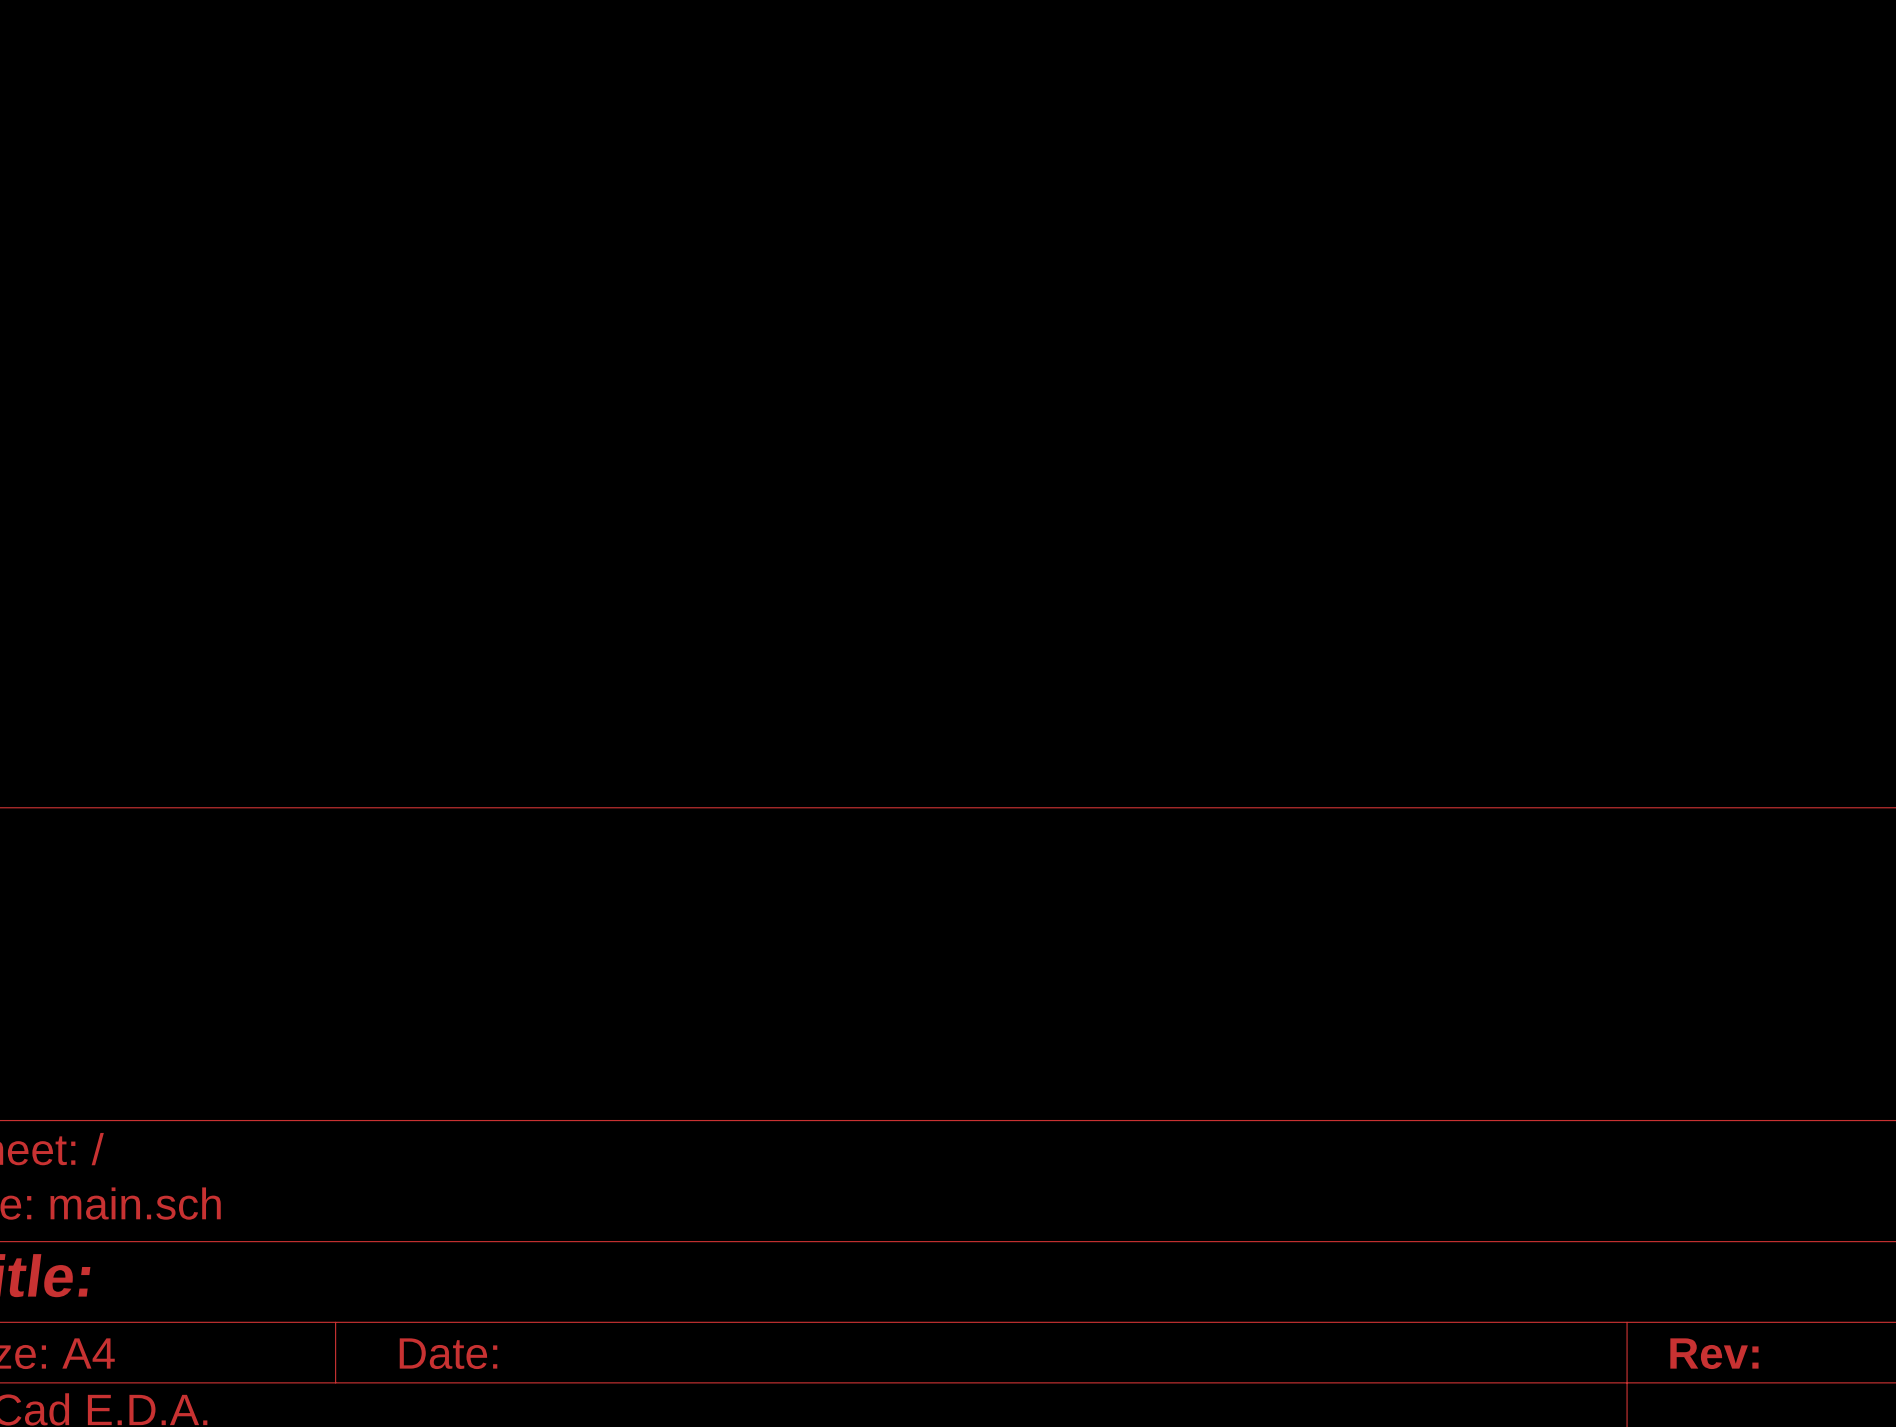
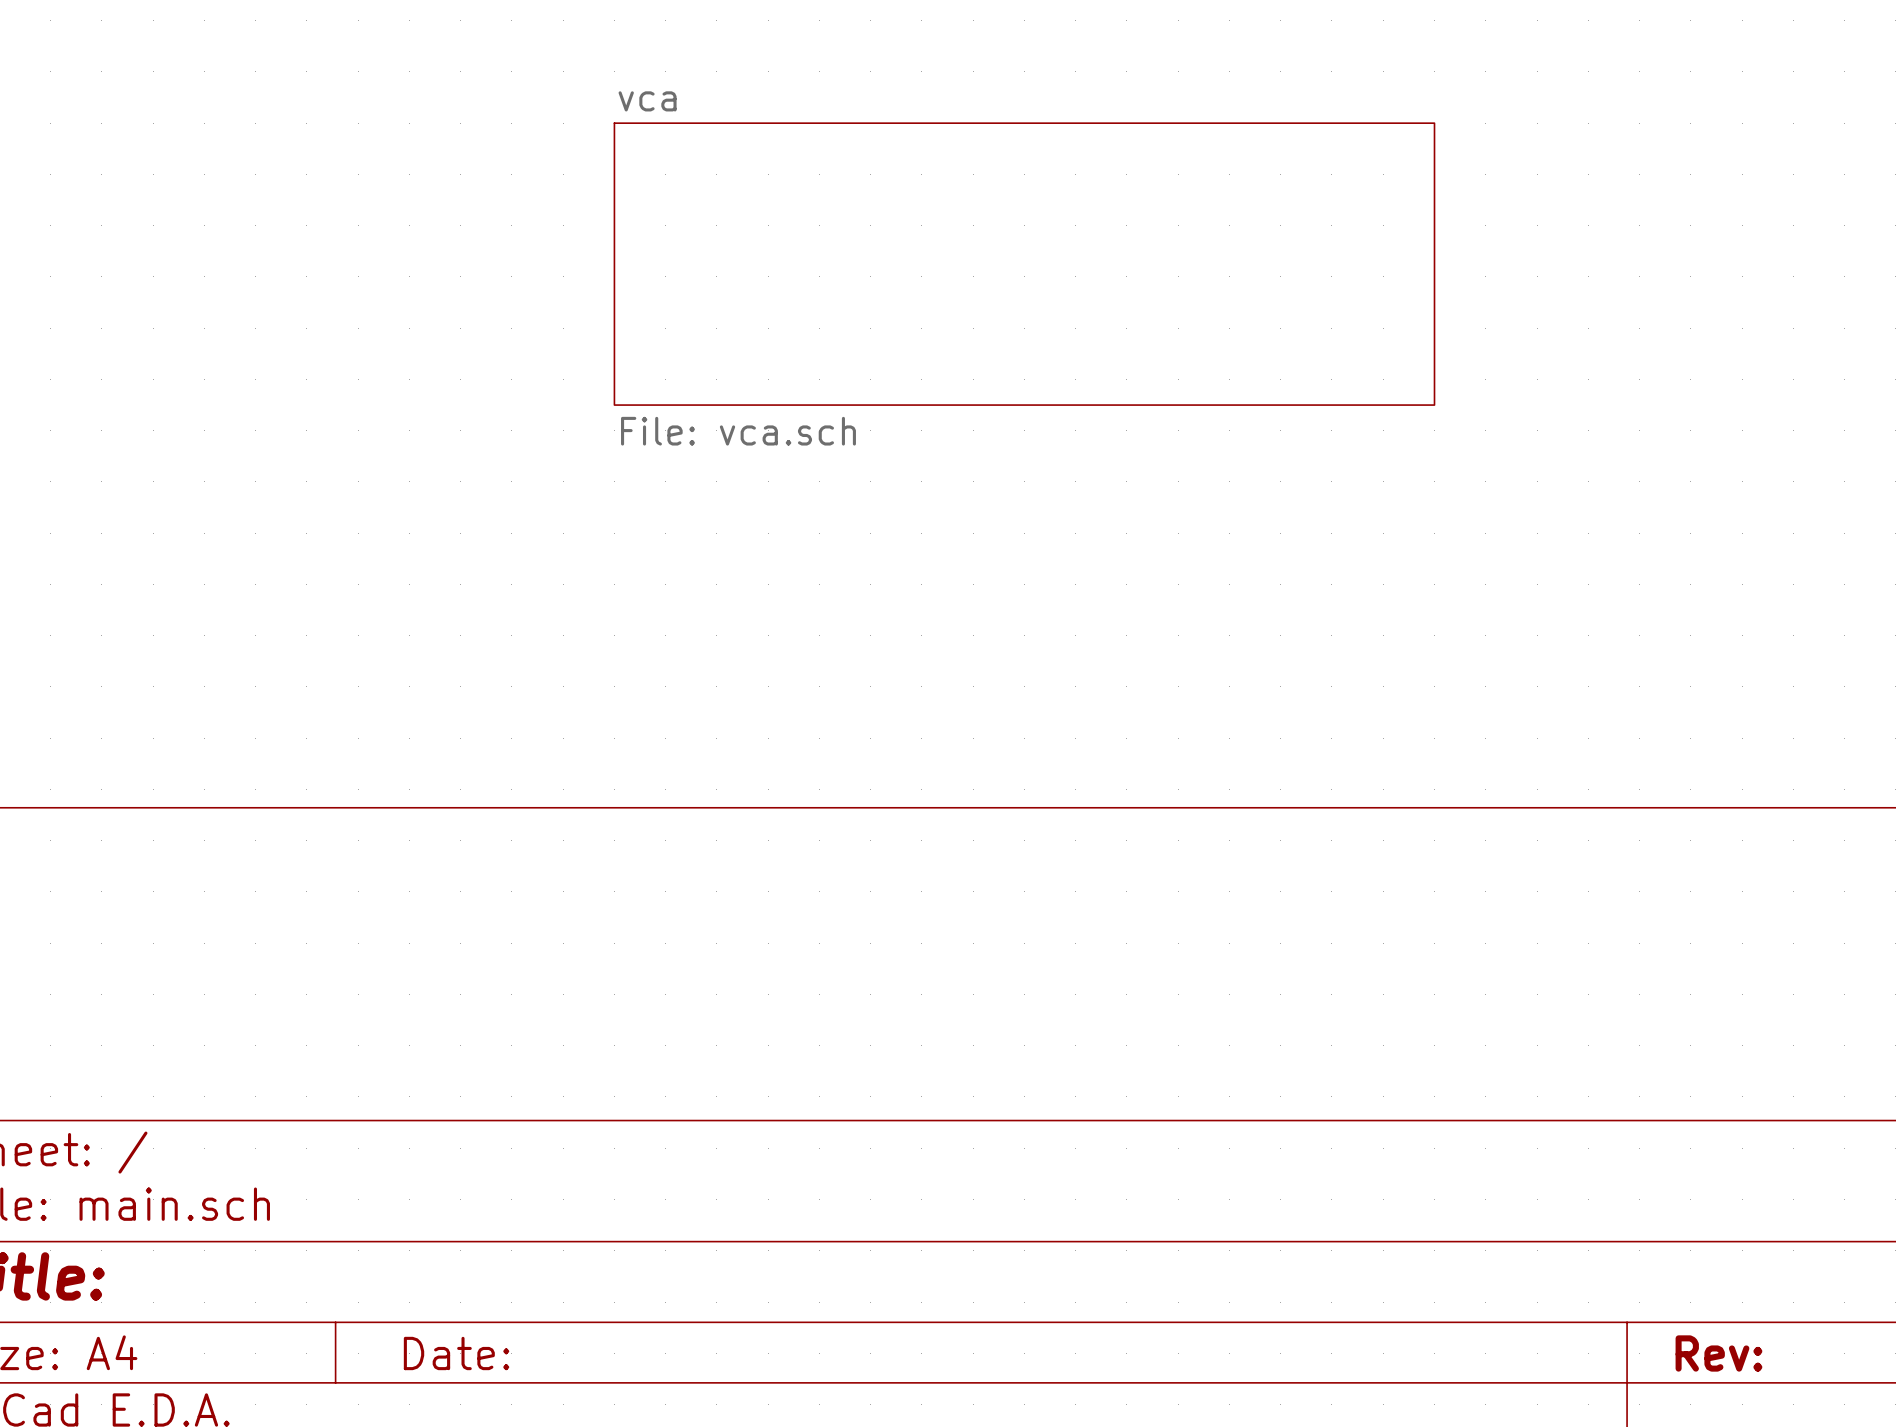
sheet vca: none -> File: vca.sch (1024, 264)

